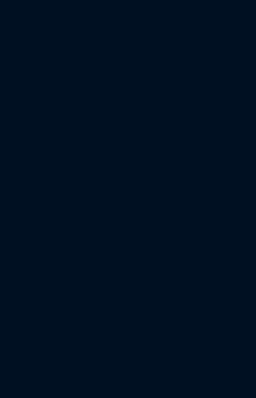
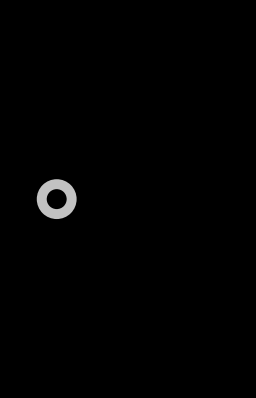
via: none -> (56, 199)

